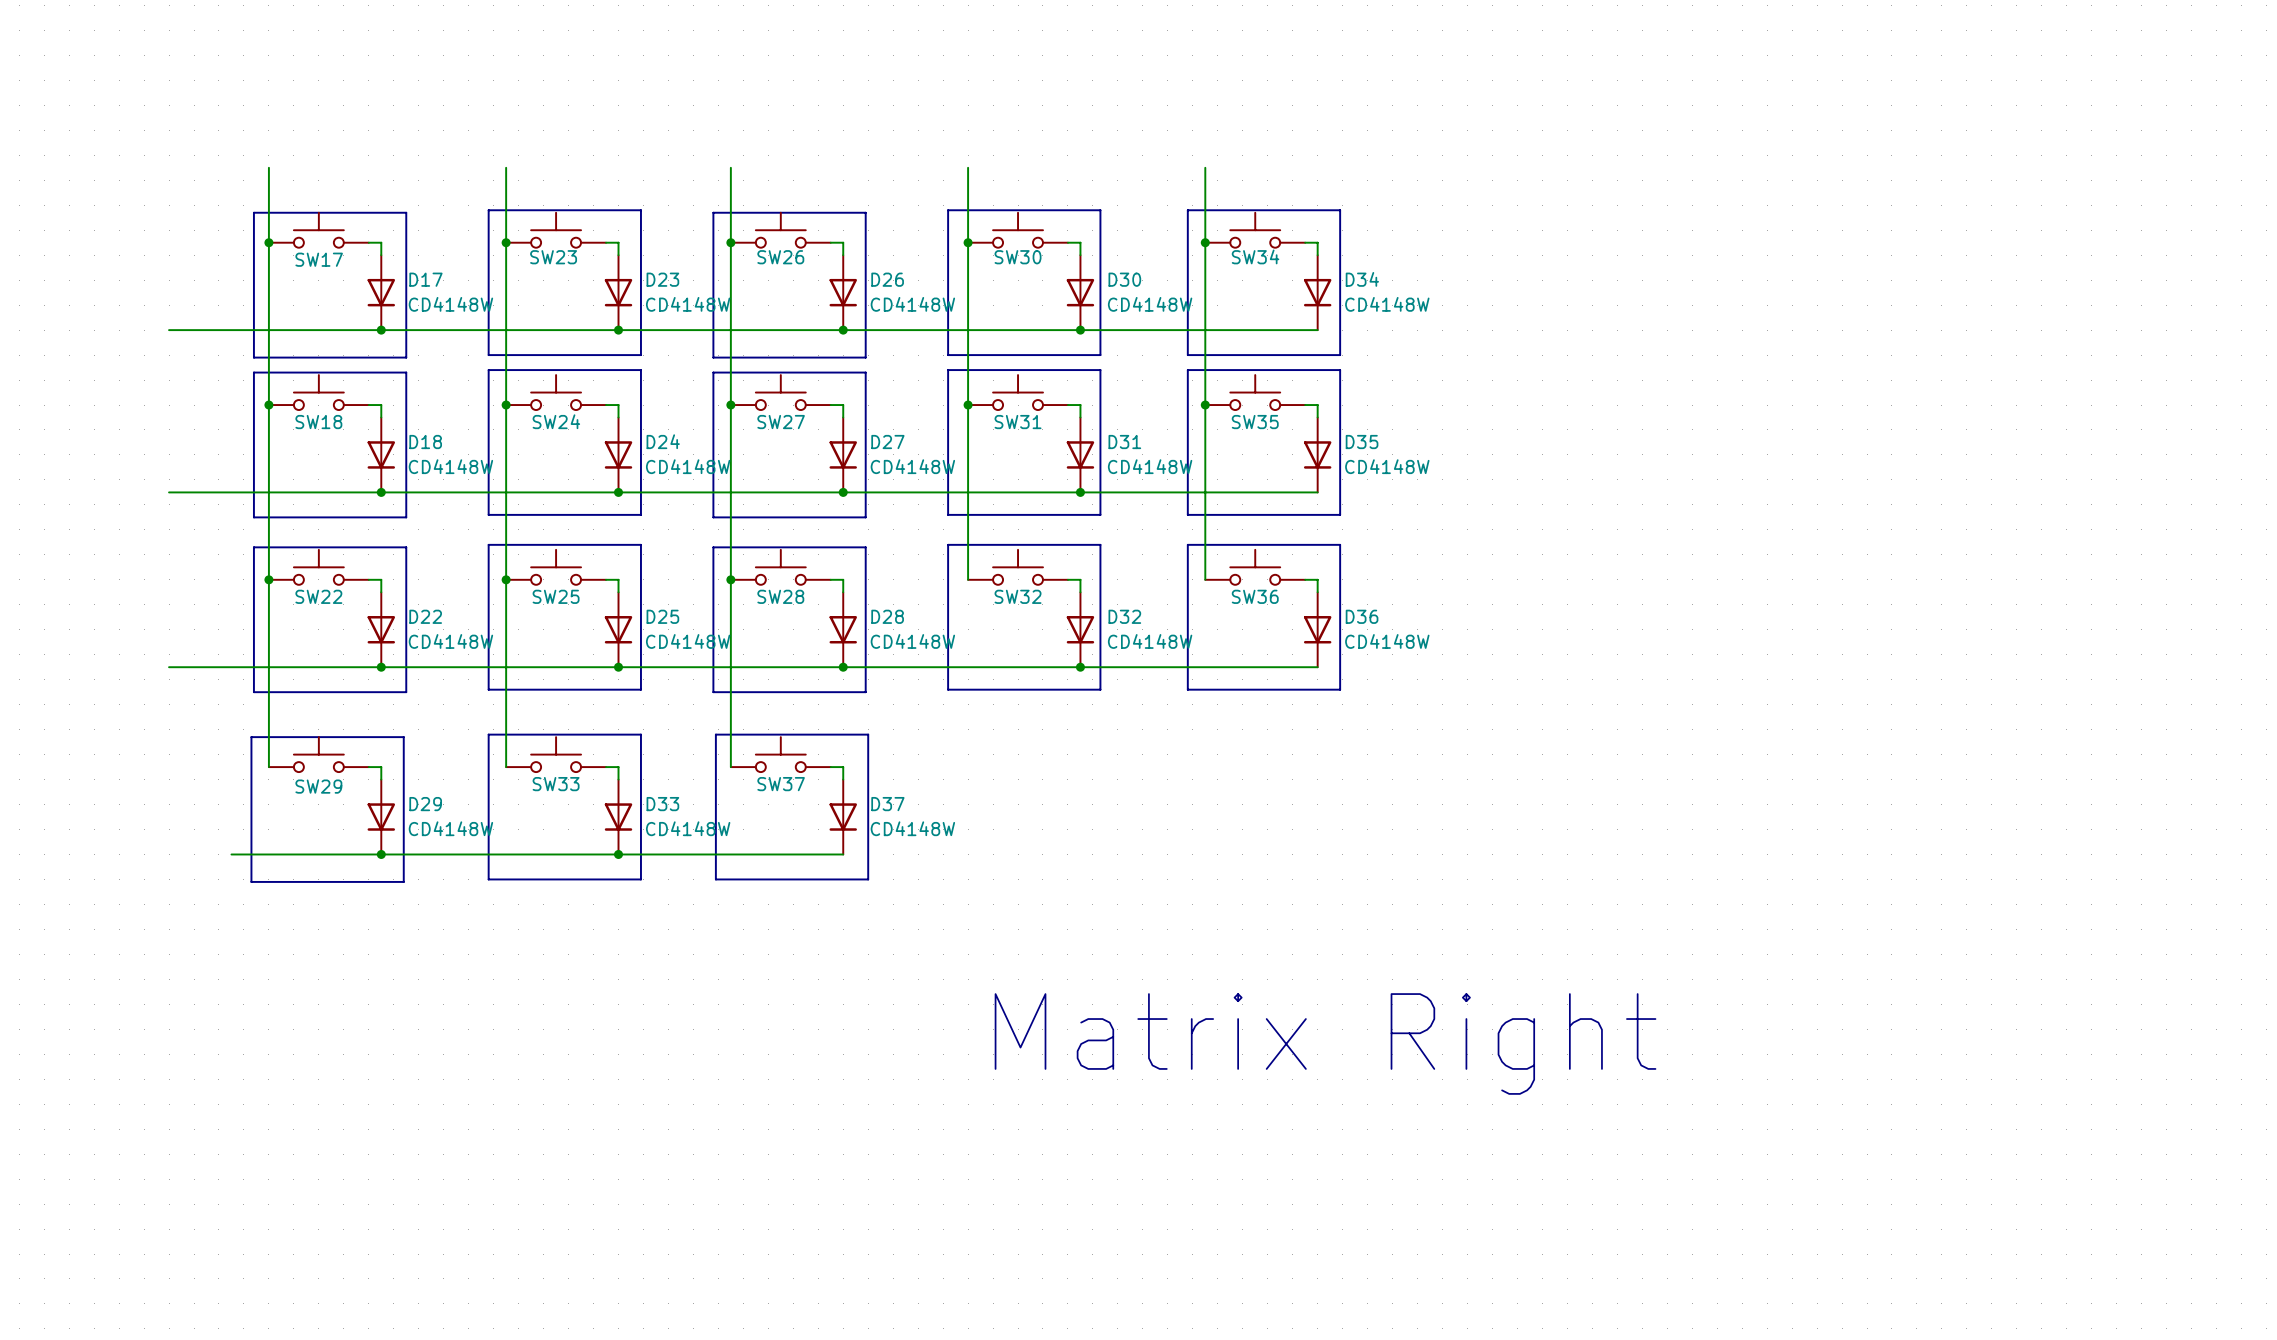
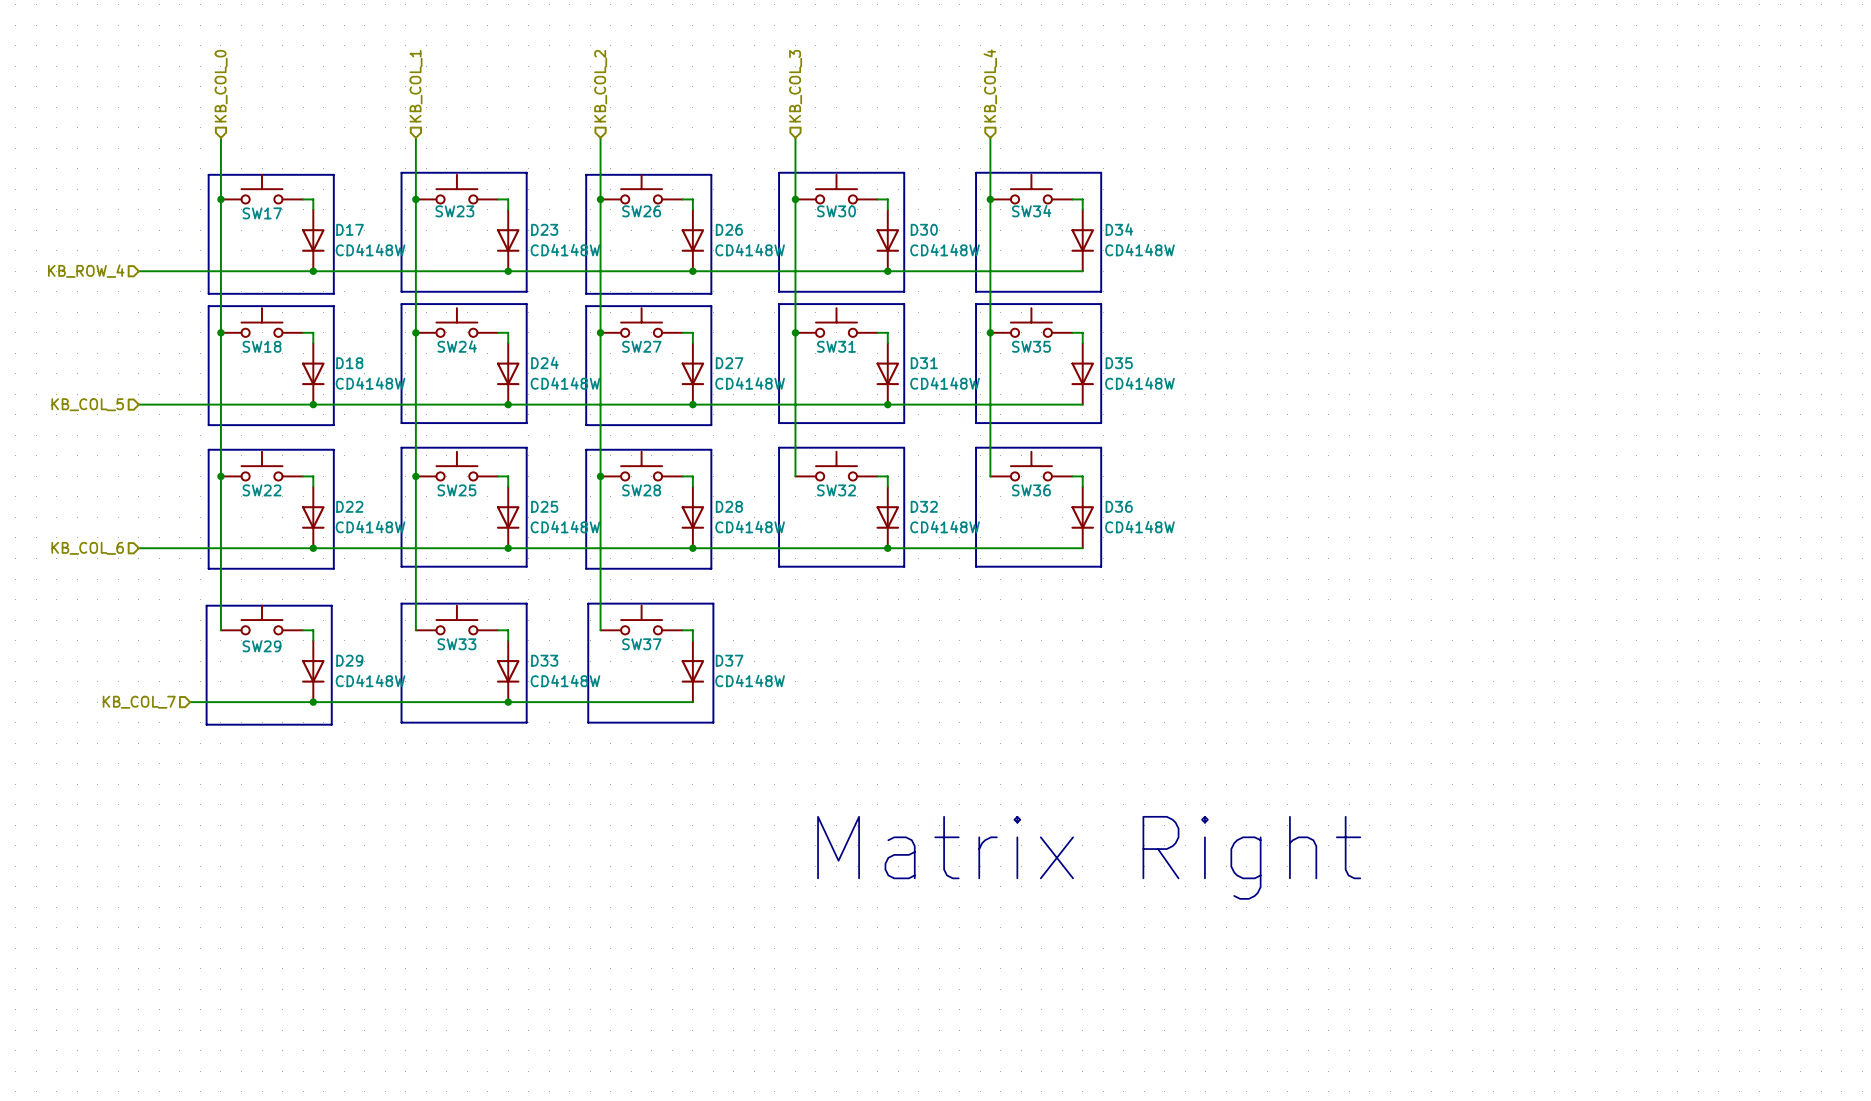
hierarchical label: none -> KB_COL_0 (221, 86)
hierarchical label: none -> KB_COL_1 (416, 86)
hierarchical label: none -> KB_COL_2 (600, 86)
hierarchical label: none -> KB_COL_3 (795, 86)
hierarchical label: none -> KB_COL_4 (990, 85)
hierarchical label: none -> KB_ROW_4 (86, 271)
hierarchical label: none -> KB_COL_5 (87, 404)
hierarchical label: none -> KB_COL_6 (87, 548)
hierarchical label: none -> KB_COL_7 (139, 702)

